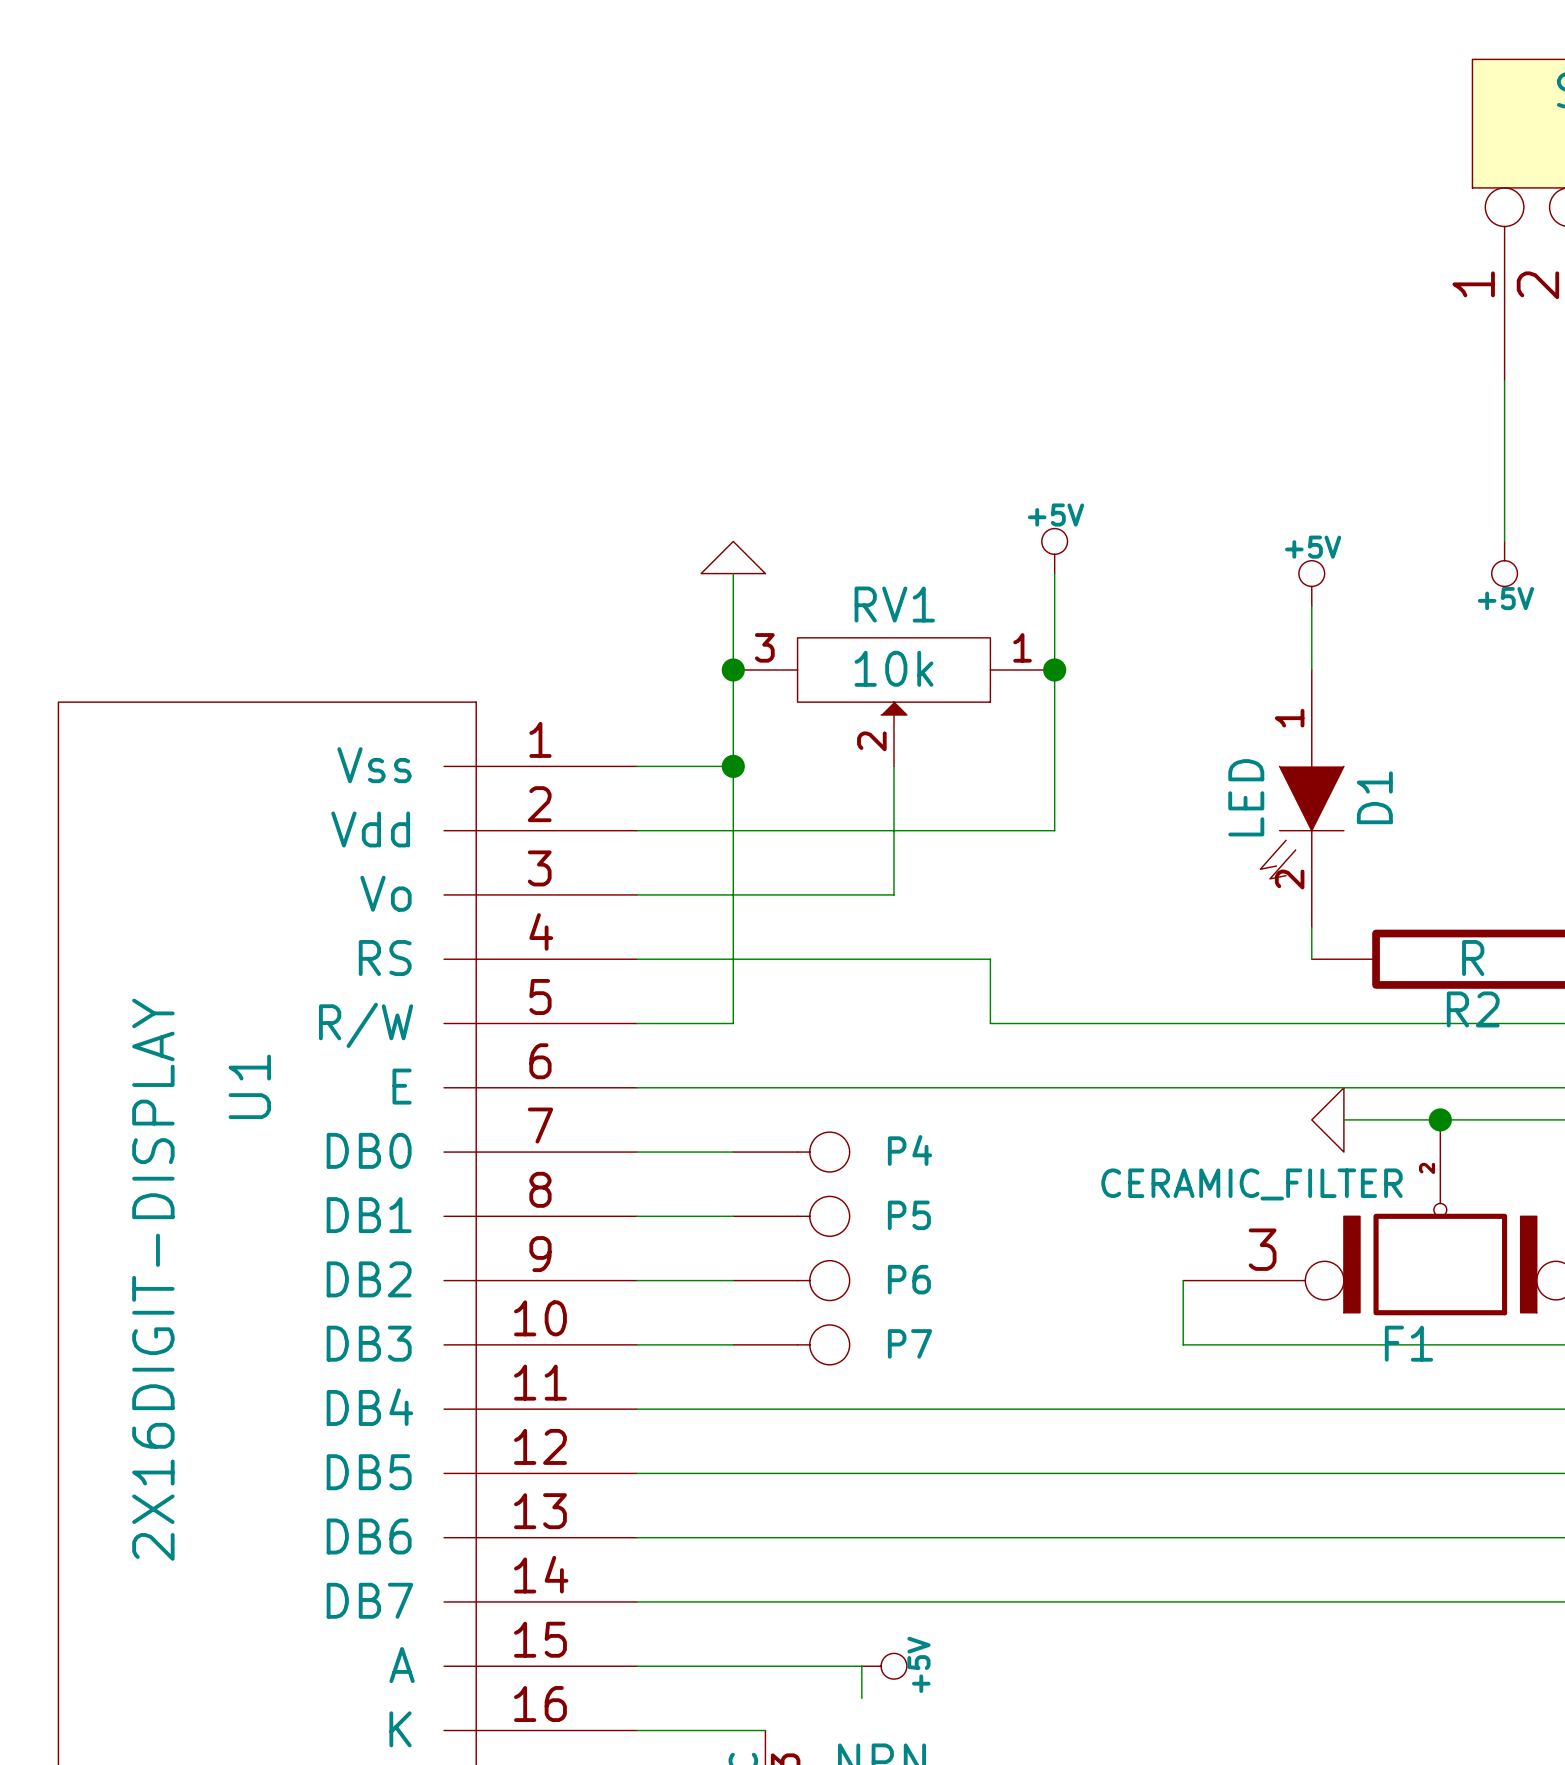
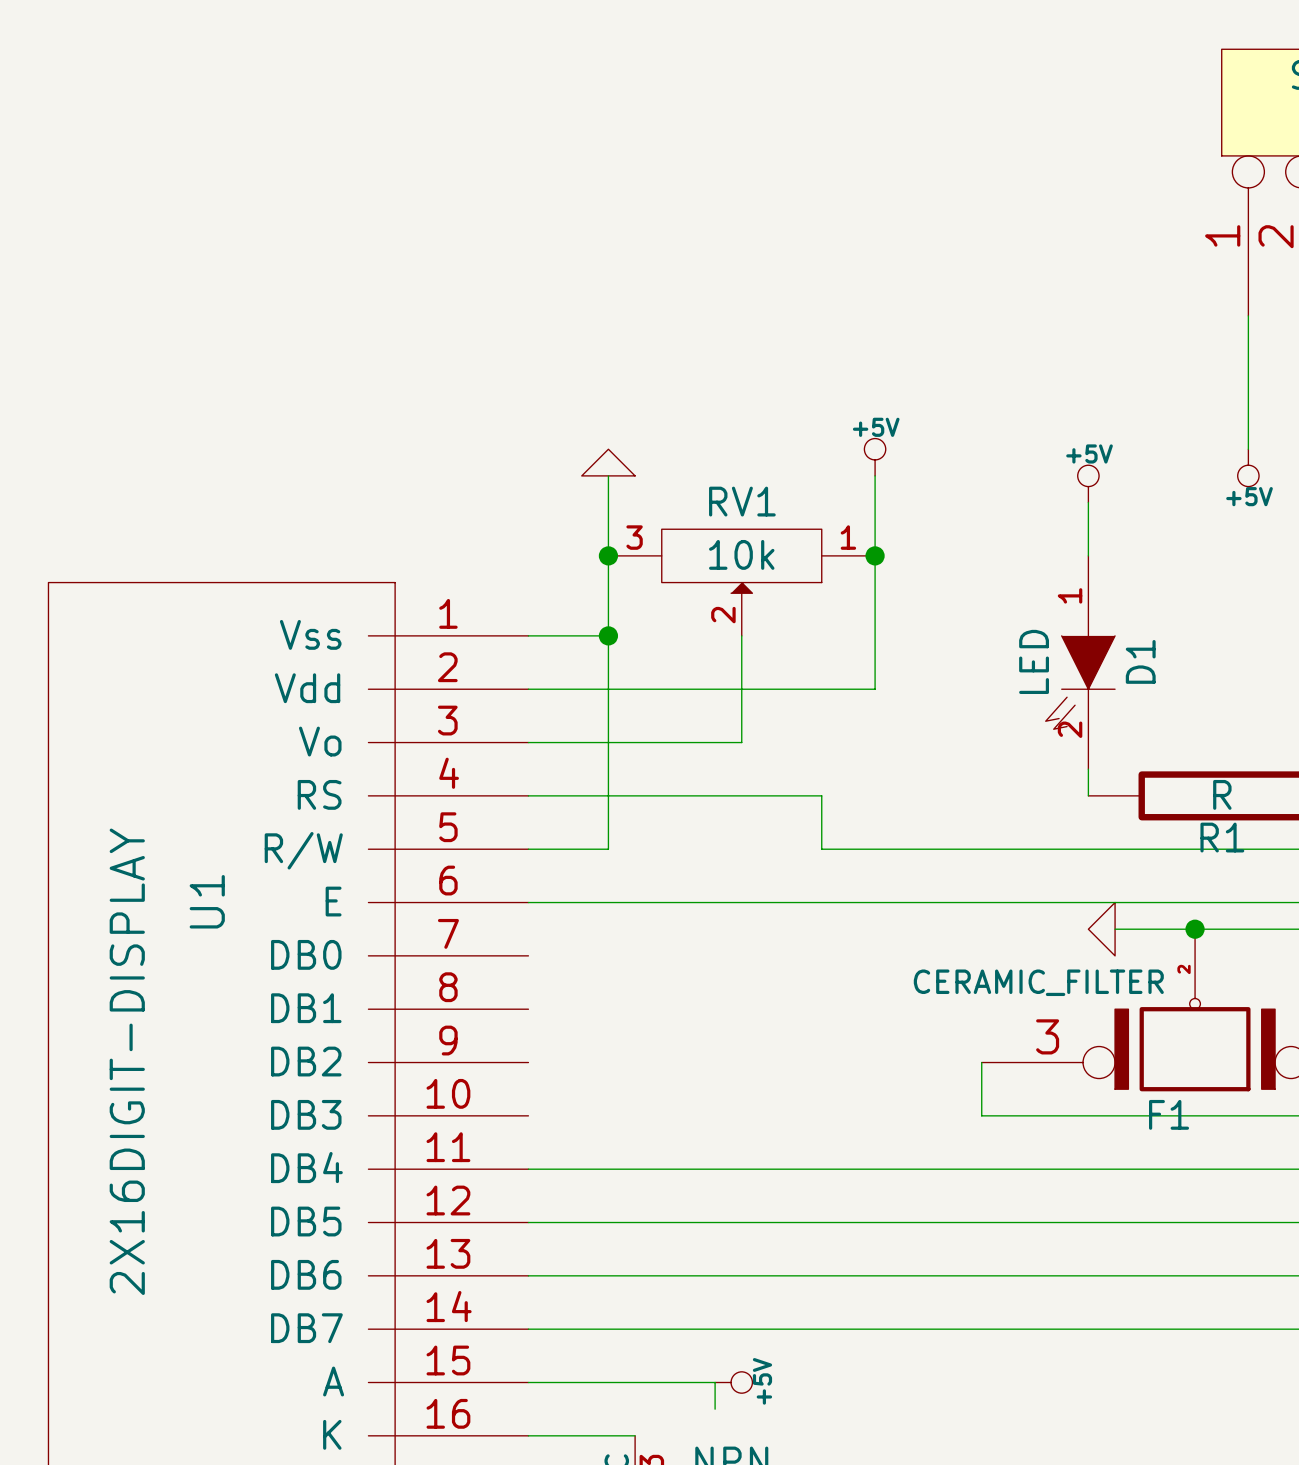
R2 name: R2 (1473, 1009) -> R1 (1222, 837)
wire: (636, 1152) (733, 1152) -> none
P4: (791, 1152) -> none
wire: (636, 1216) (733, 1216) -> none
P5: (791, 1216) -> none
wire: (636, 1280) (733, 1280) -> none
P6: (791, 1280) -> none
wire: (636, 1344) (733, 1344) -> none
P7: (791, 1344) -> none

